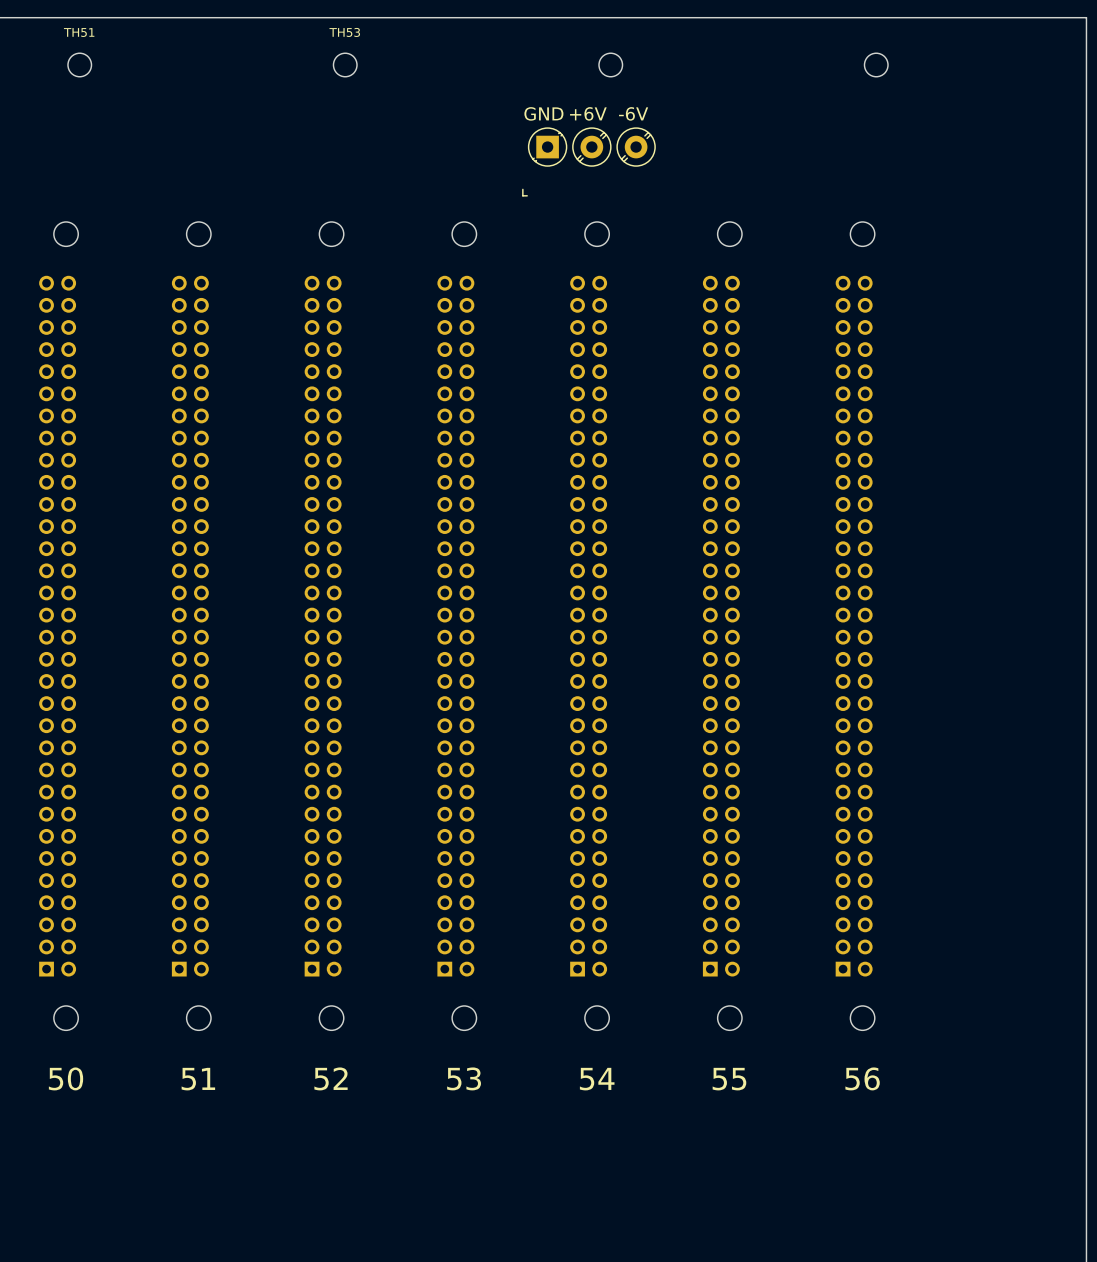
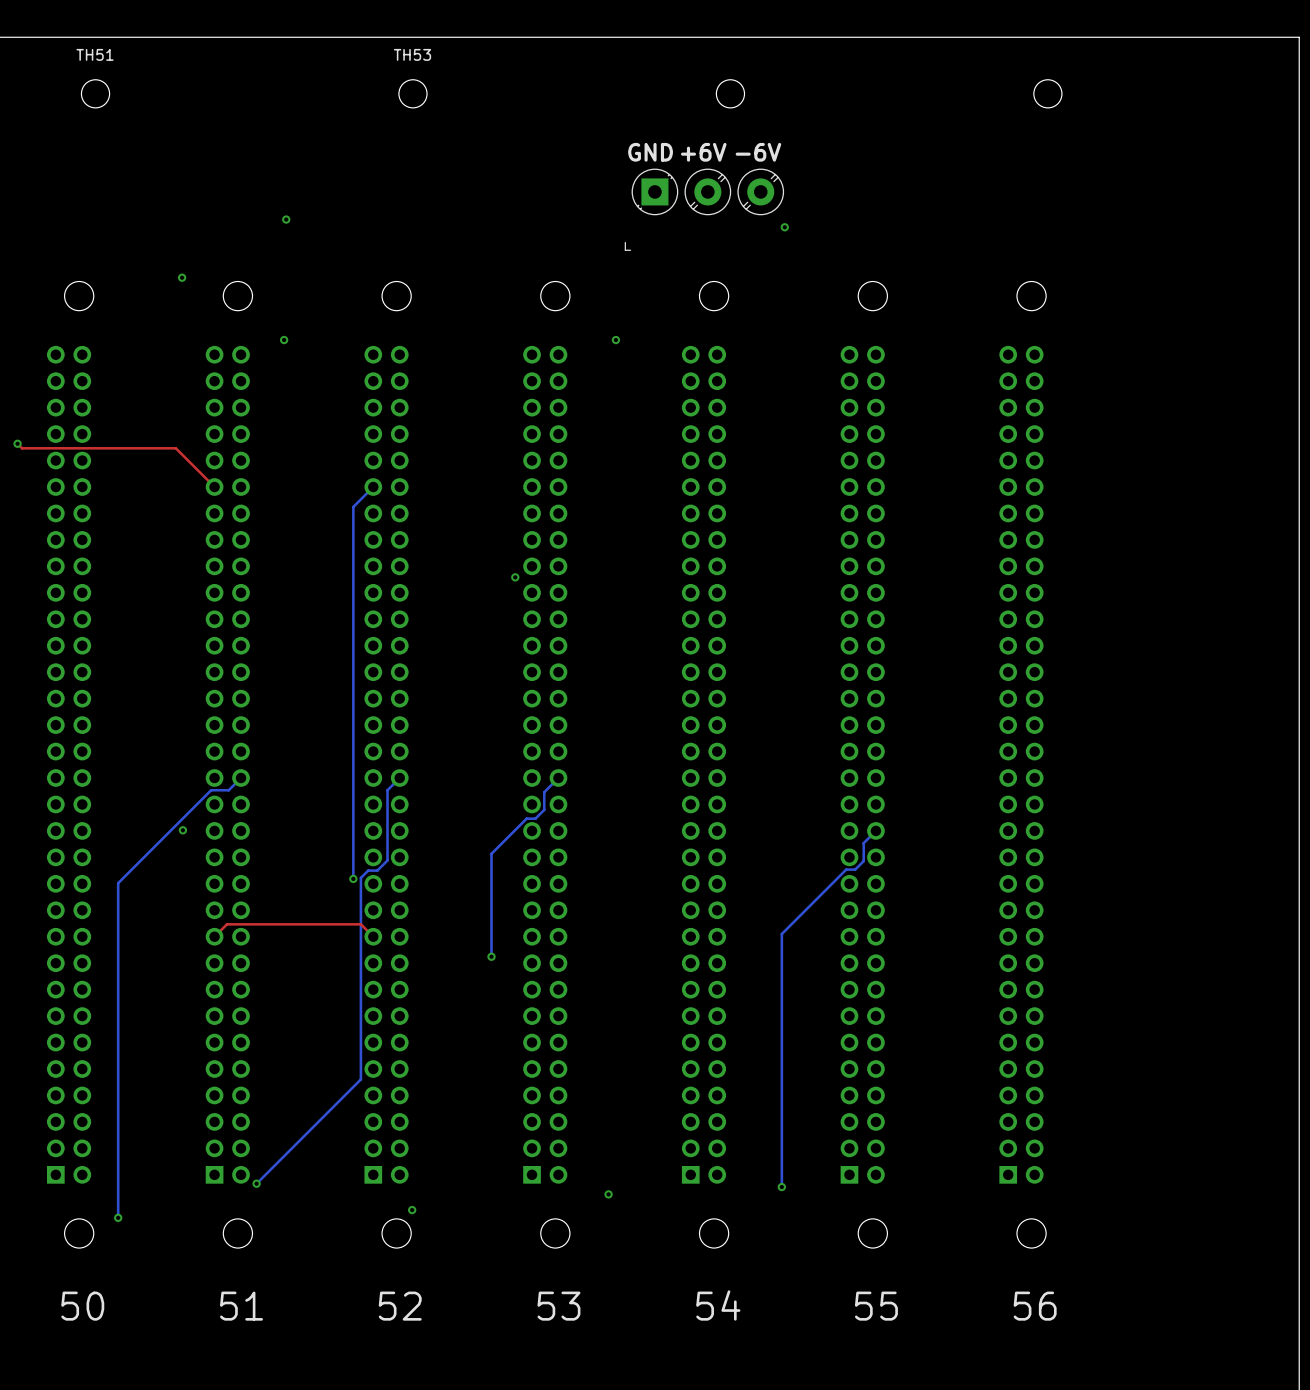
via: none -> (286, 219)
via: none -> (784, 227)
via: none -> (182, 277)
via: none -> (284, 340)
via: none -> (615, 340)
top track: none -> (17, 443) (22, 448) (175, 448) (214, 487)
via: none -> (17, 443)
bottom track: none -> (373, 487) (353, 506) (353, 878)
via: none -> (515, 577)
bottom track: none -> (241, 778) (228, 790) (211, 790) (118, 883) (118, 1217)
bottom track: none -> (399, 778) (387, 790) (387, 860) (377, 870) (368, 870) (360, 877) (360, 1079) (256, 1183)
bottom track: none -> (558, 778) (544, 792) (544, 809) (535, 818) (526, 818) (491, 853) (491, 956)
via: none -> (182, 830)
bottom track: none -> (875, 830) (863, 843) (863, 861) (855, 869) (846, 869) (781, 934) (781, 1187)
via: none -> (353, 878)
top track: none -> (214, 936) (226, 924) (360, 924) (373, 936)
via: none -> (491, 956)
via: none -> (256, 1183)
via: none -> (781, 1187)
via: none -> (608, 1194)
via: none -> (412, 1210)
via: none -> (118, 1217)

